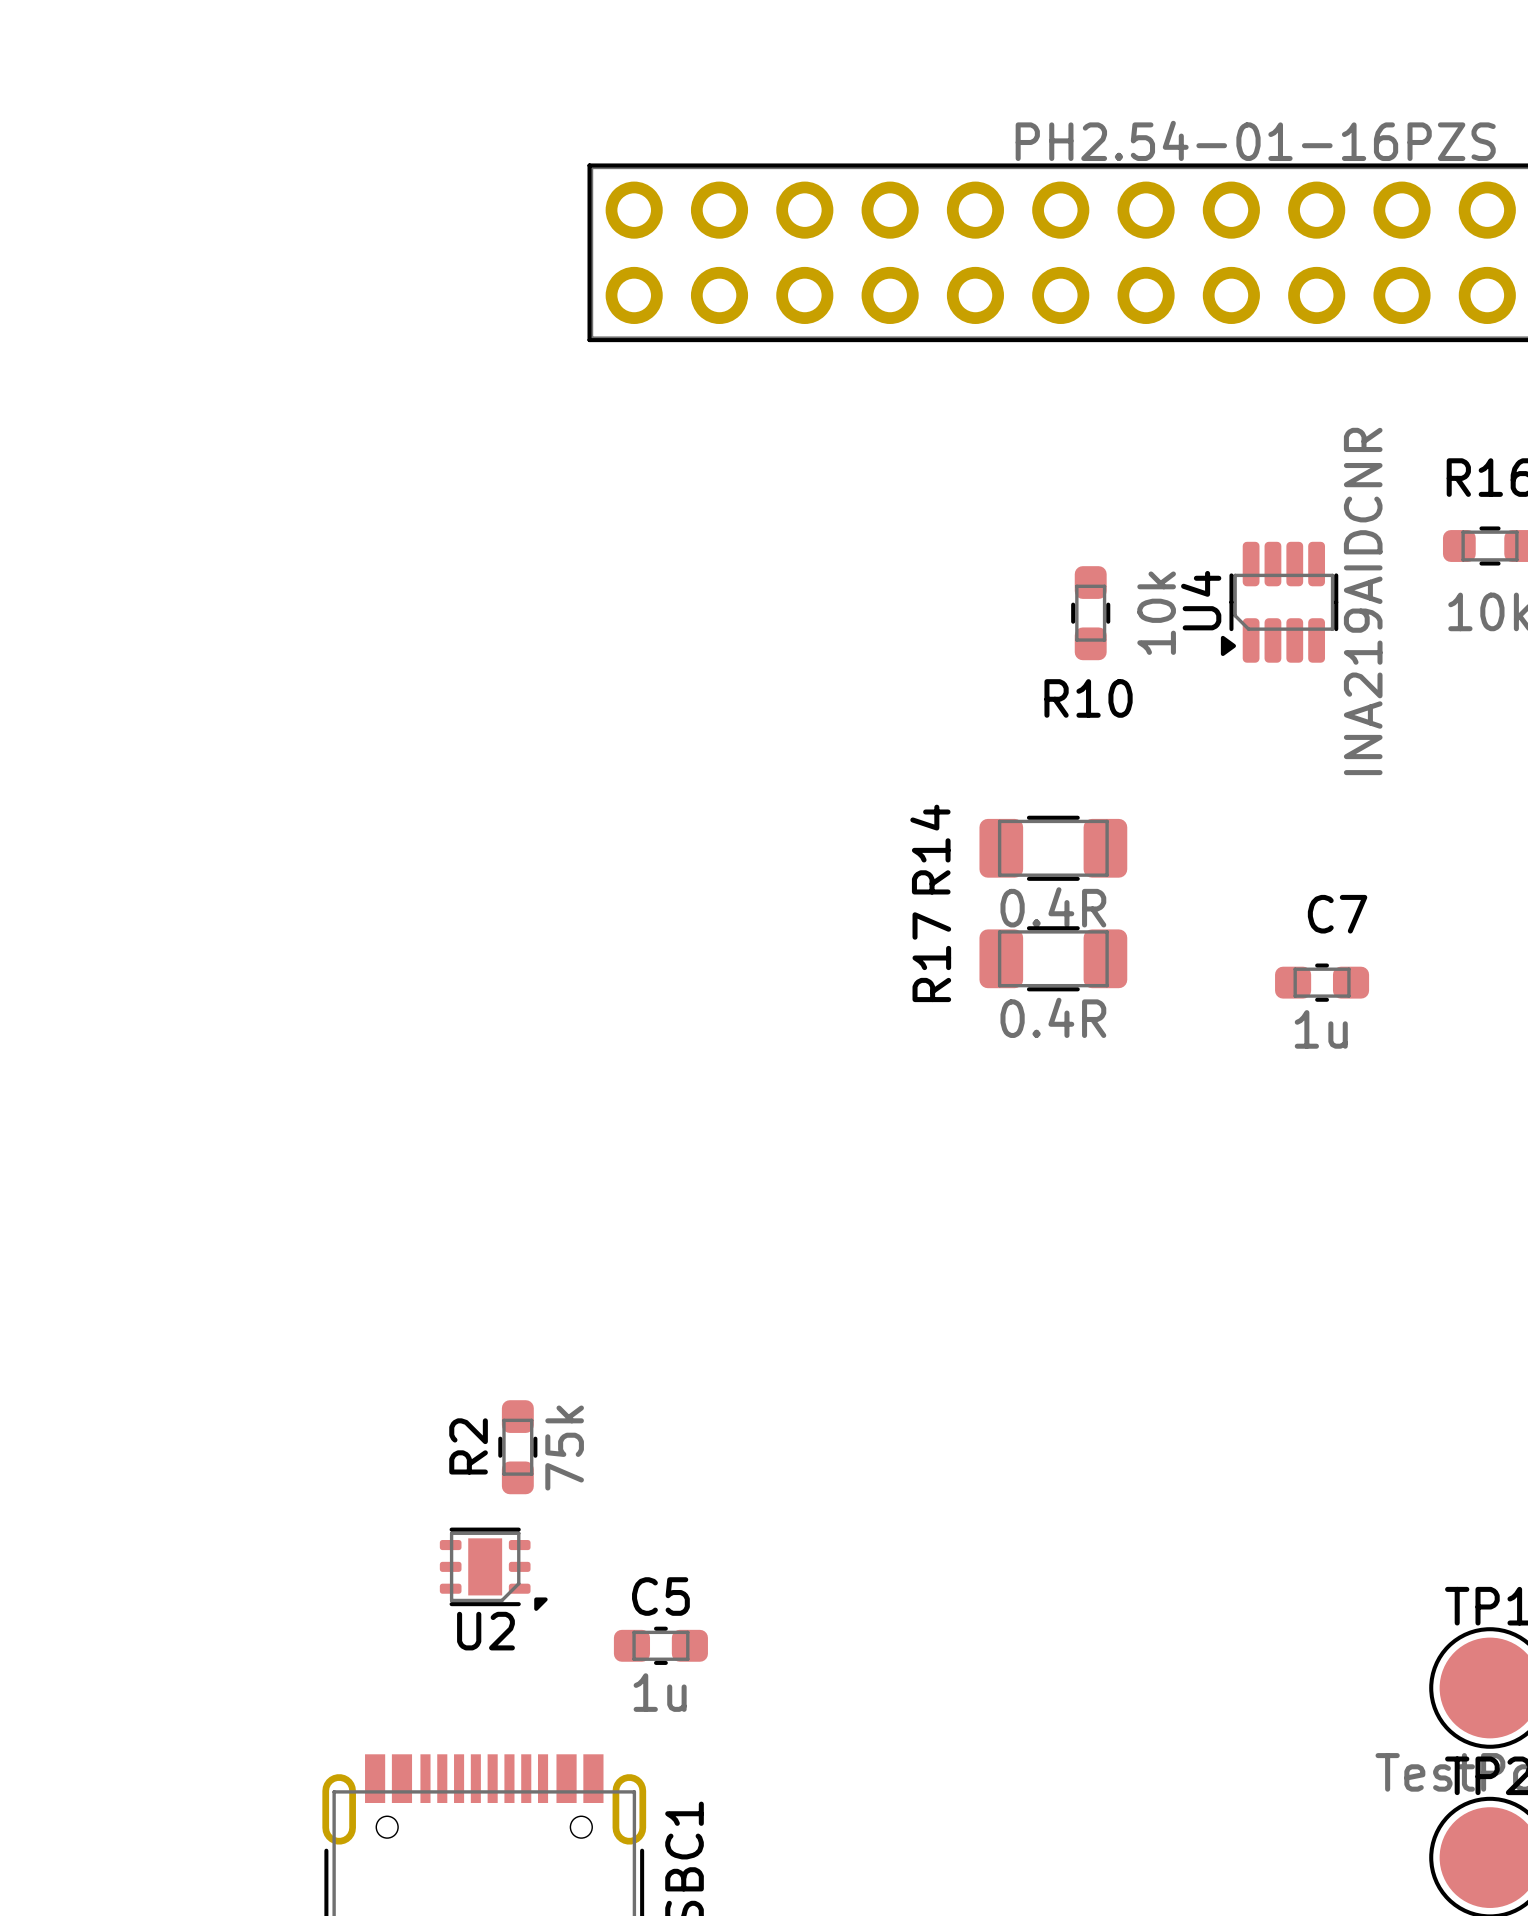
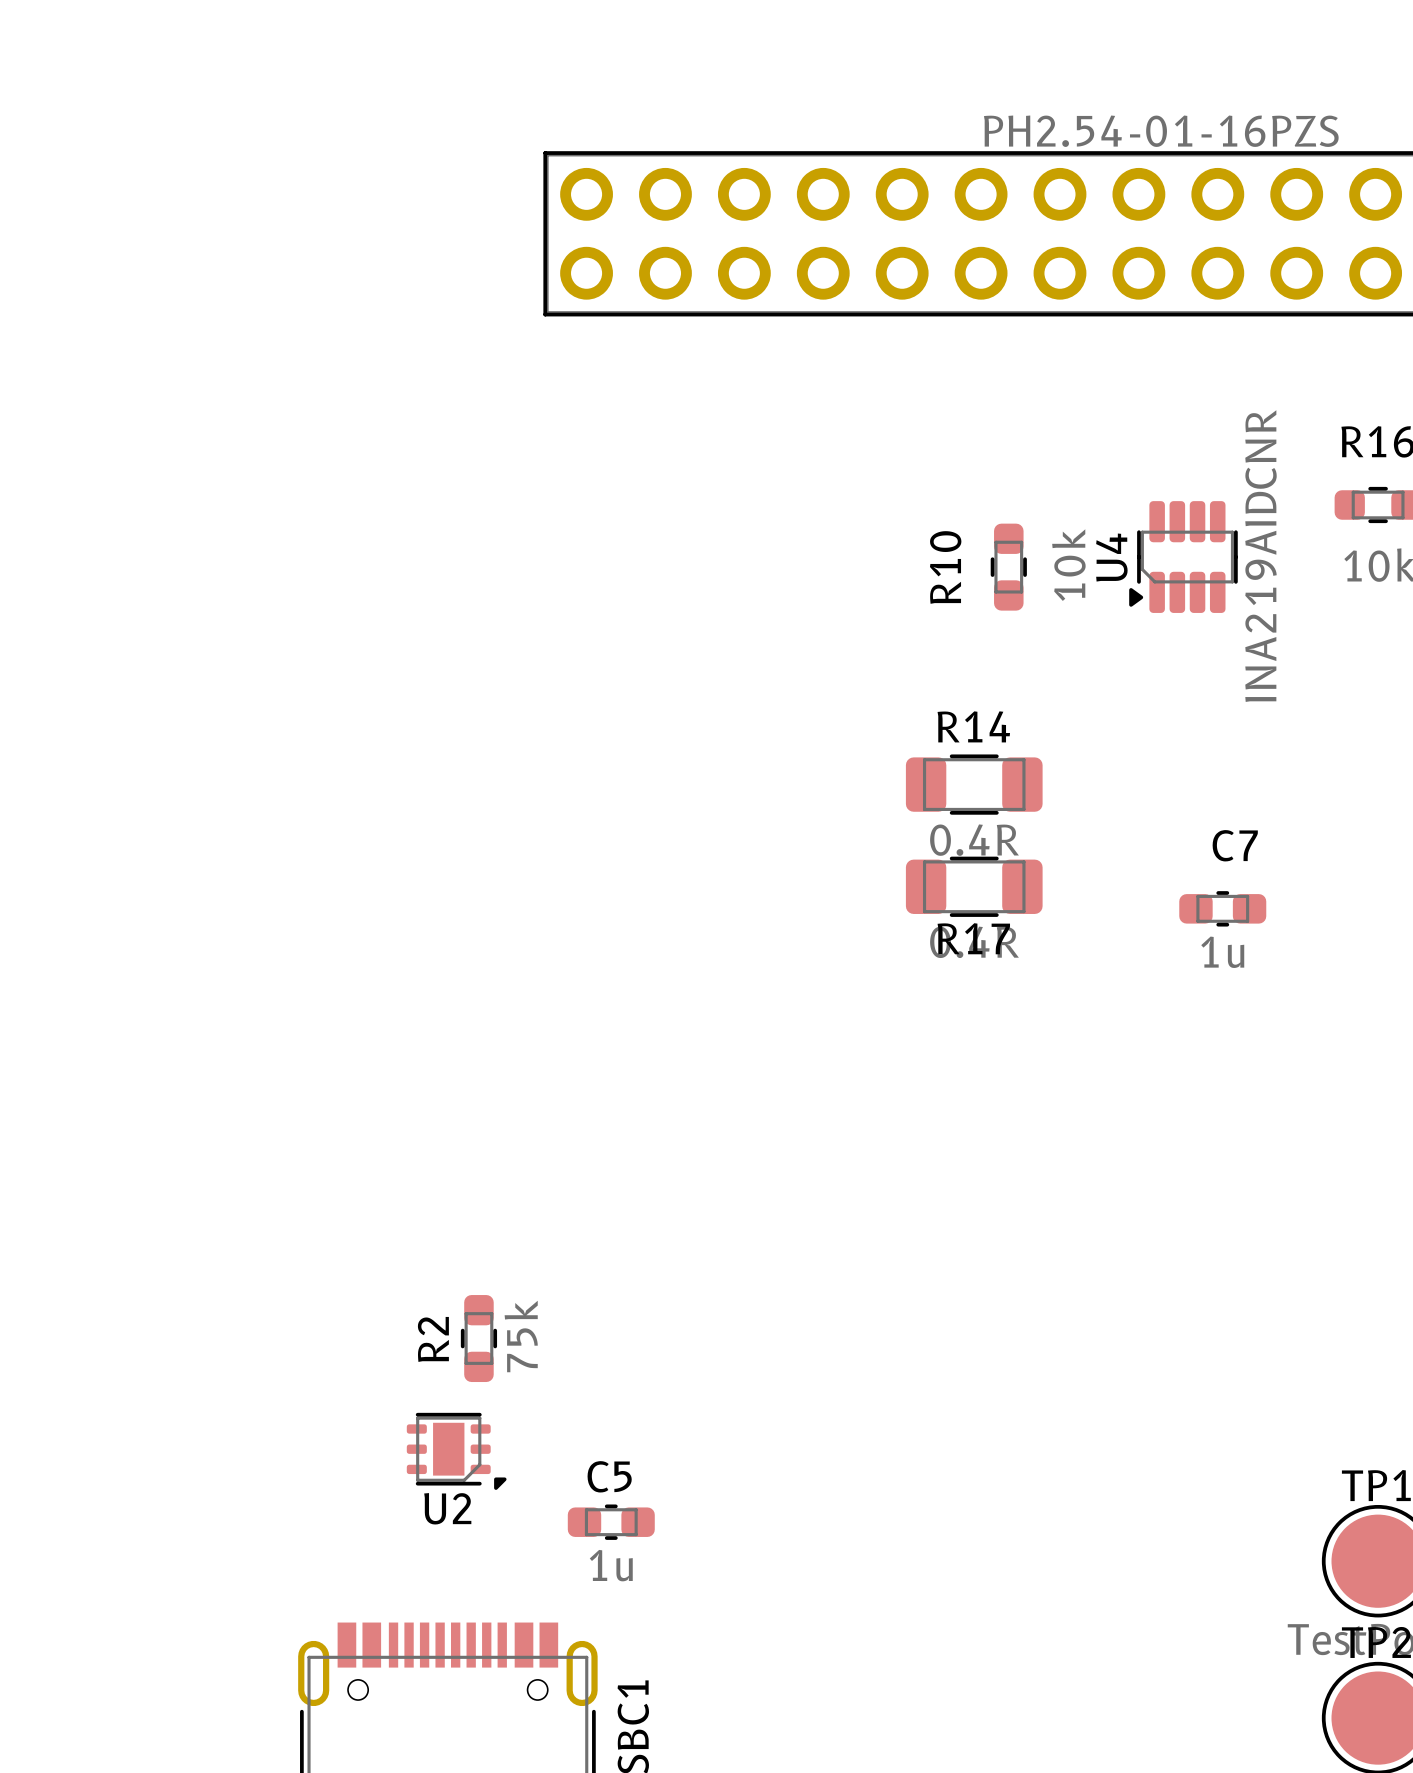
R10 name rotation: 0° (1088, 698) -> 90° counterclockwise (945, 567)
R14 name rotation: 0° (930, 849) -> 90° clockwise (973, 726)
R14 name position: R14 (930, 849) -> R14 (973, 726)
R17 name rotation: 0° (931, 957) -> 90° clockwise (973, 938)
R17 name position: R17 (931, 957) -> R17 (973, 938)

